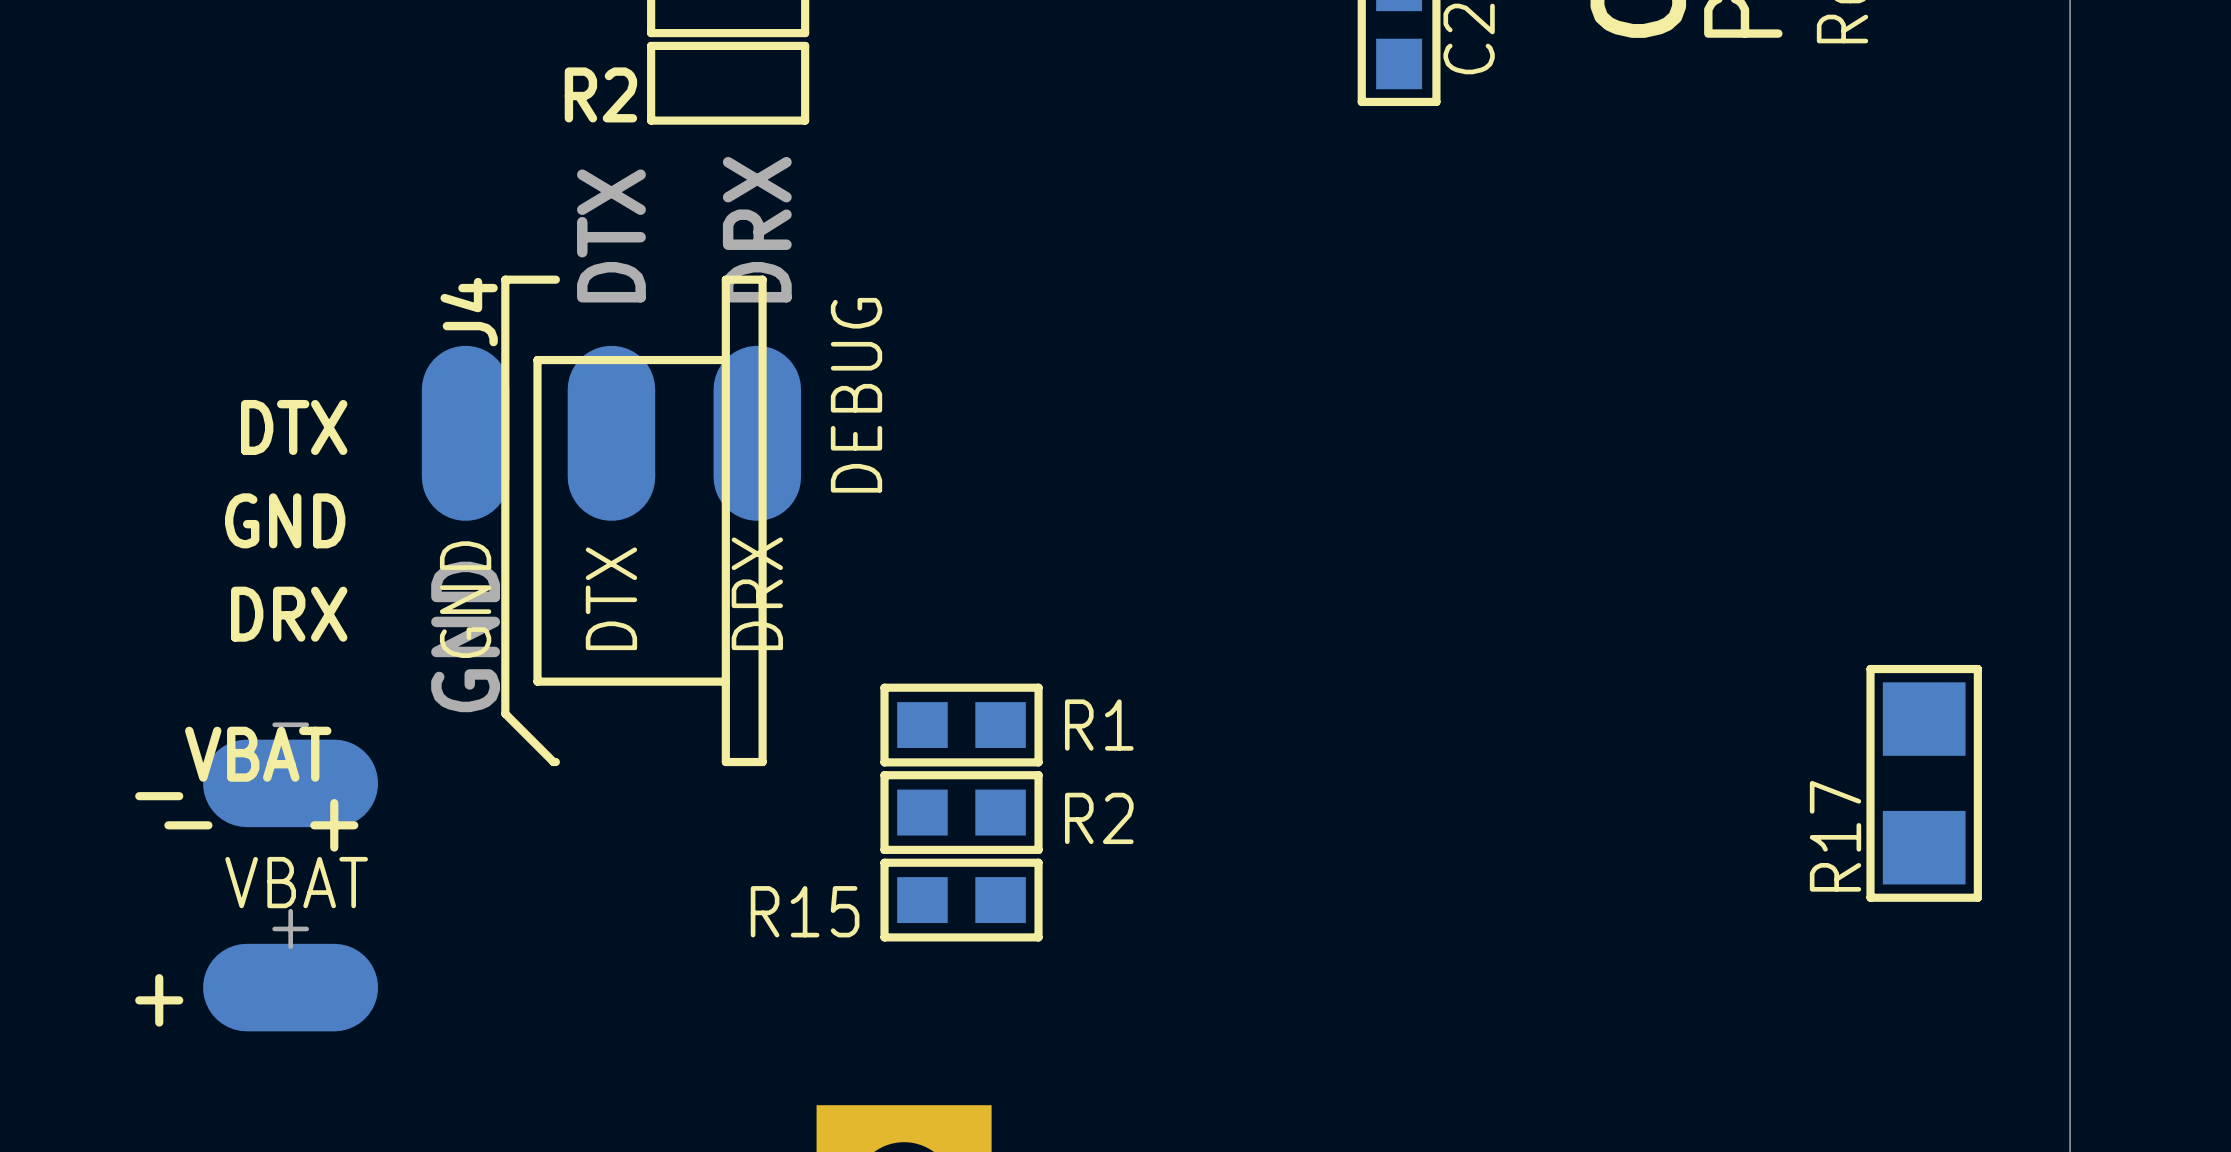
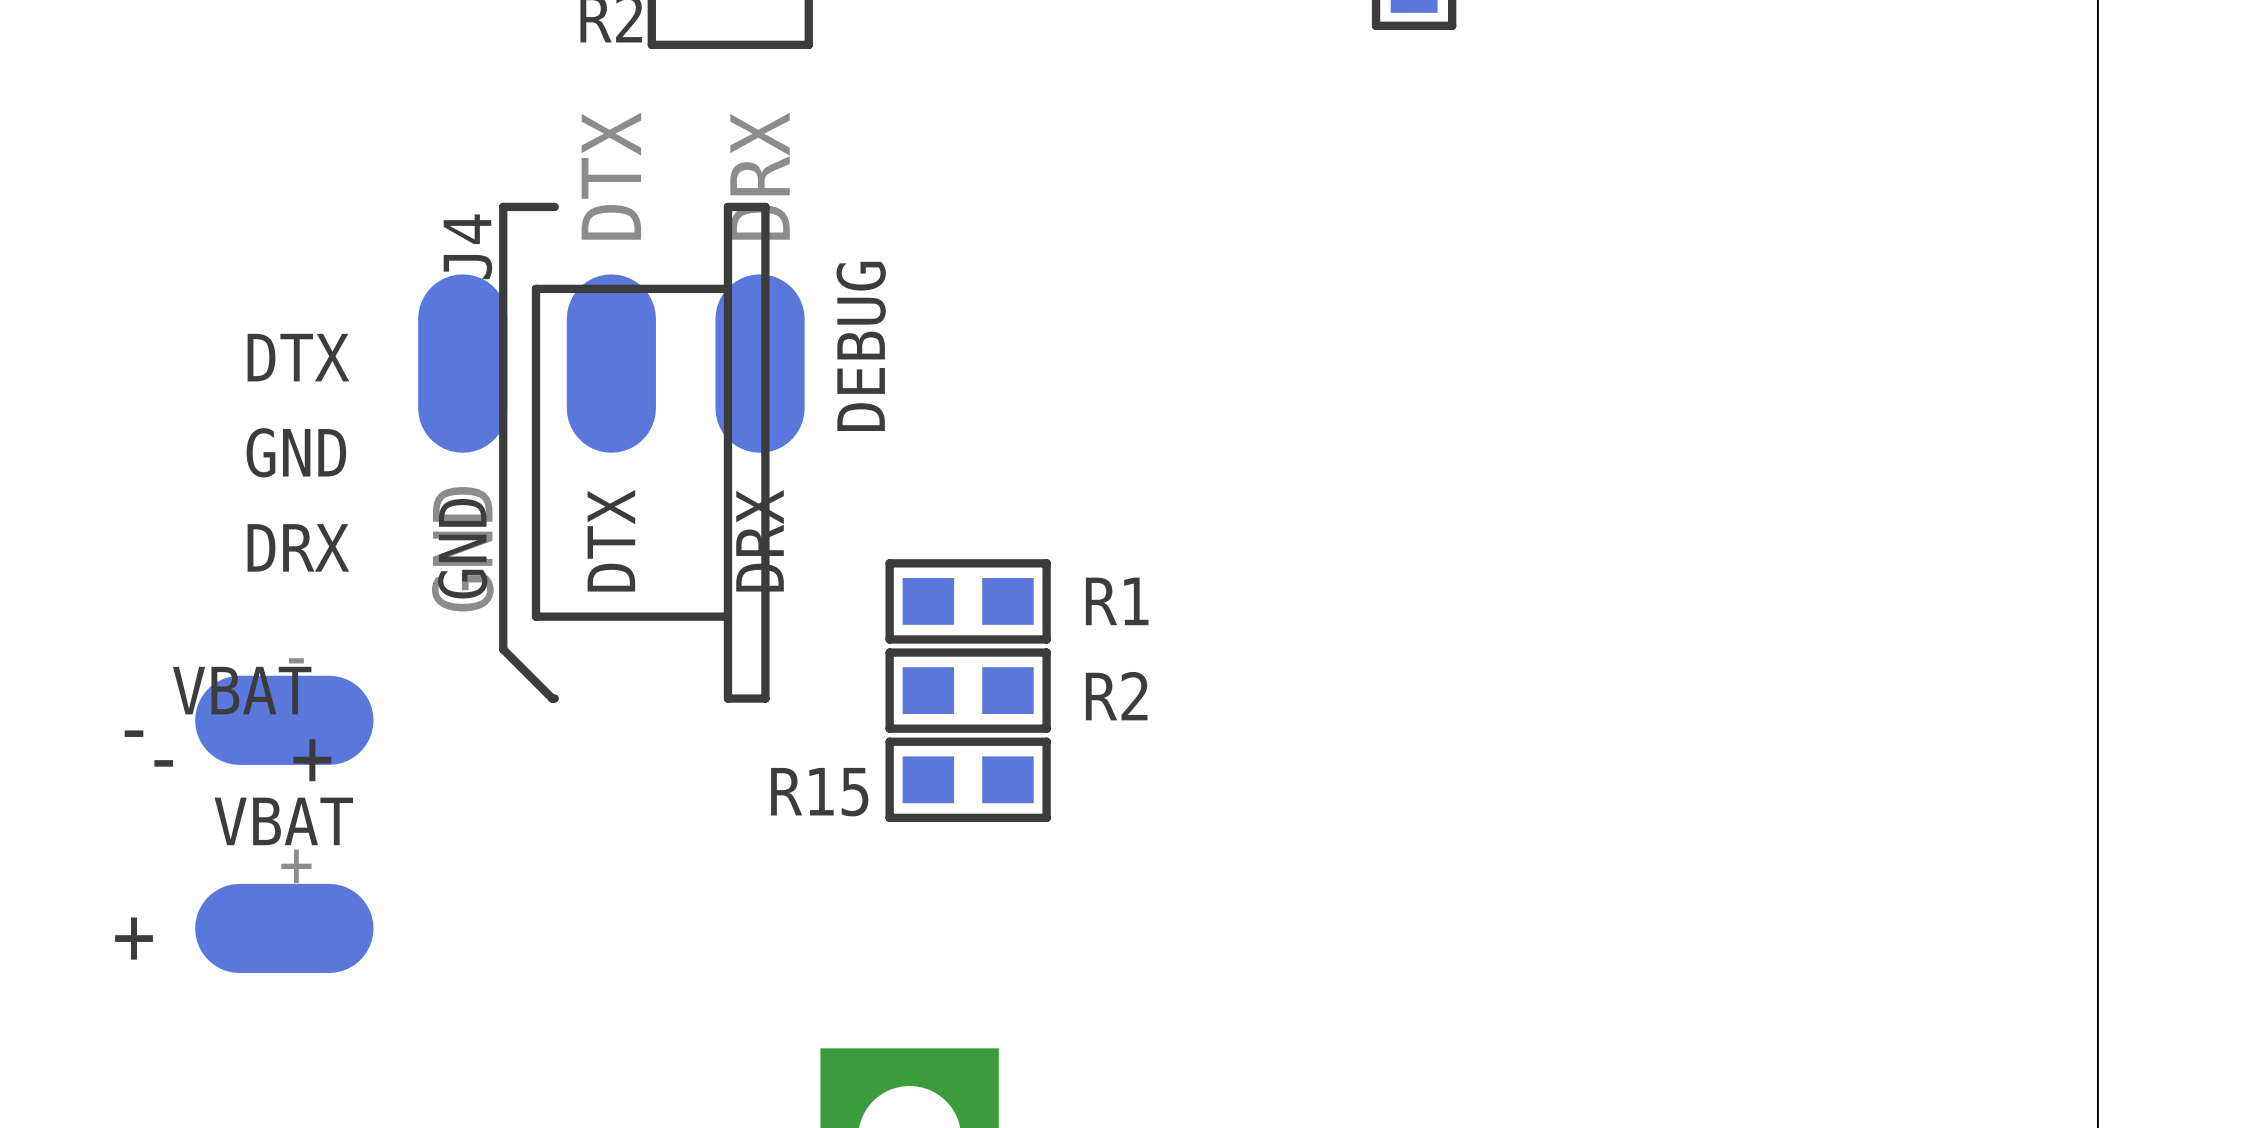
R1 position: (961, 725) -> (968, 601)
R17: (1924, 783) -> none
R2 position: (961, 812) -> (968, 690)
R15 position: (961, 900) -> (968, 779)

